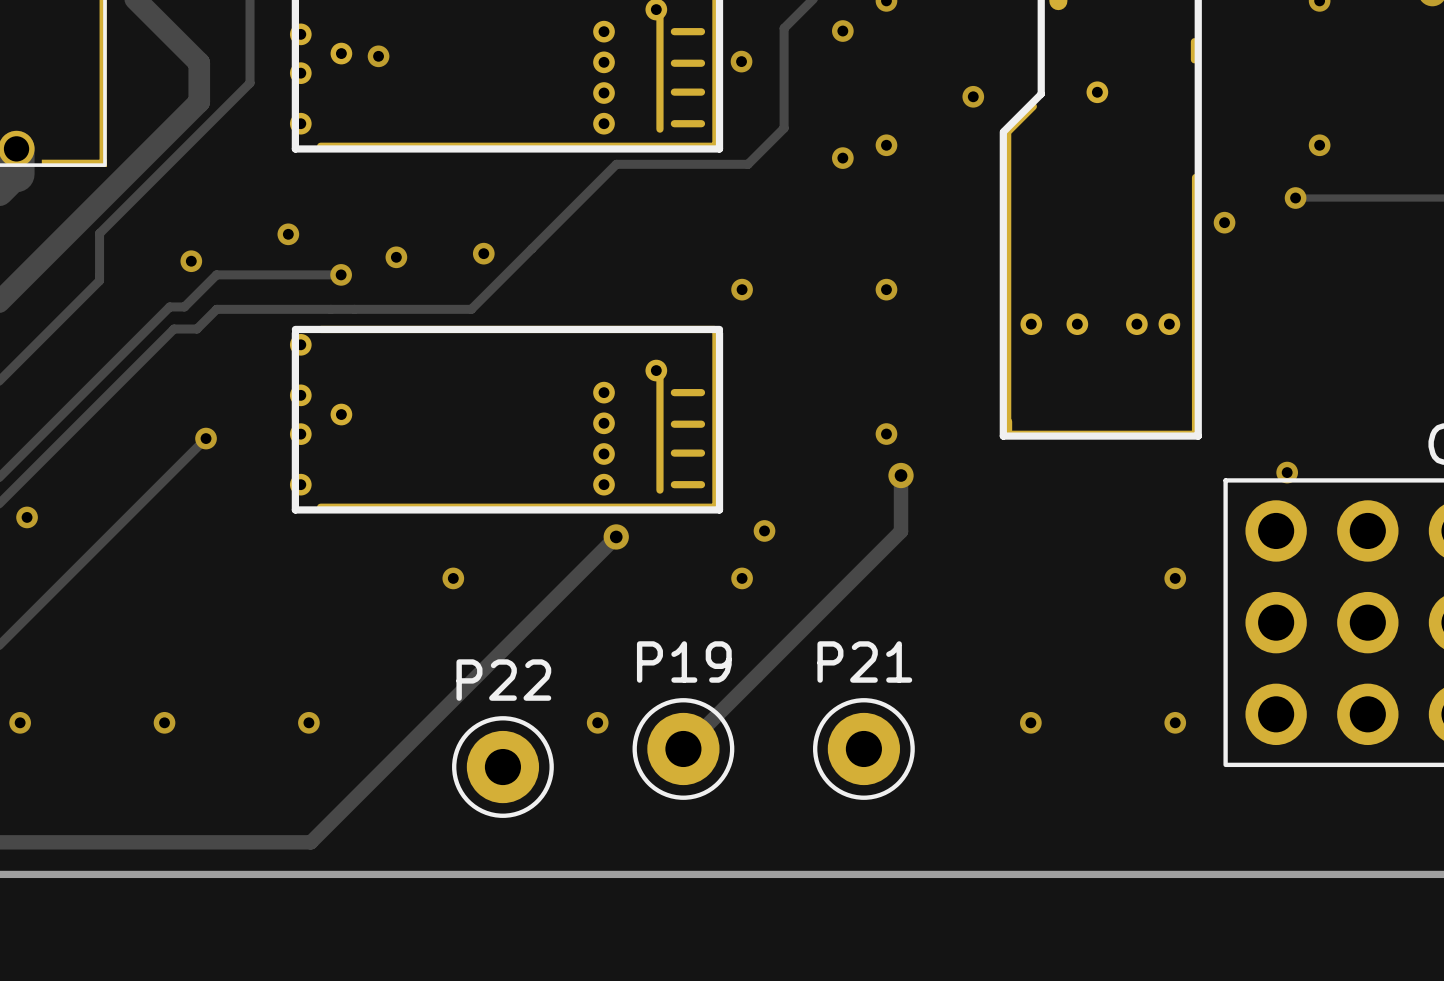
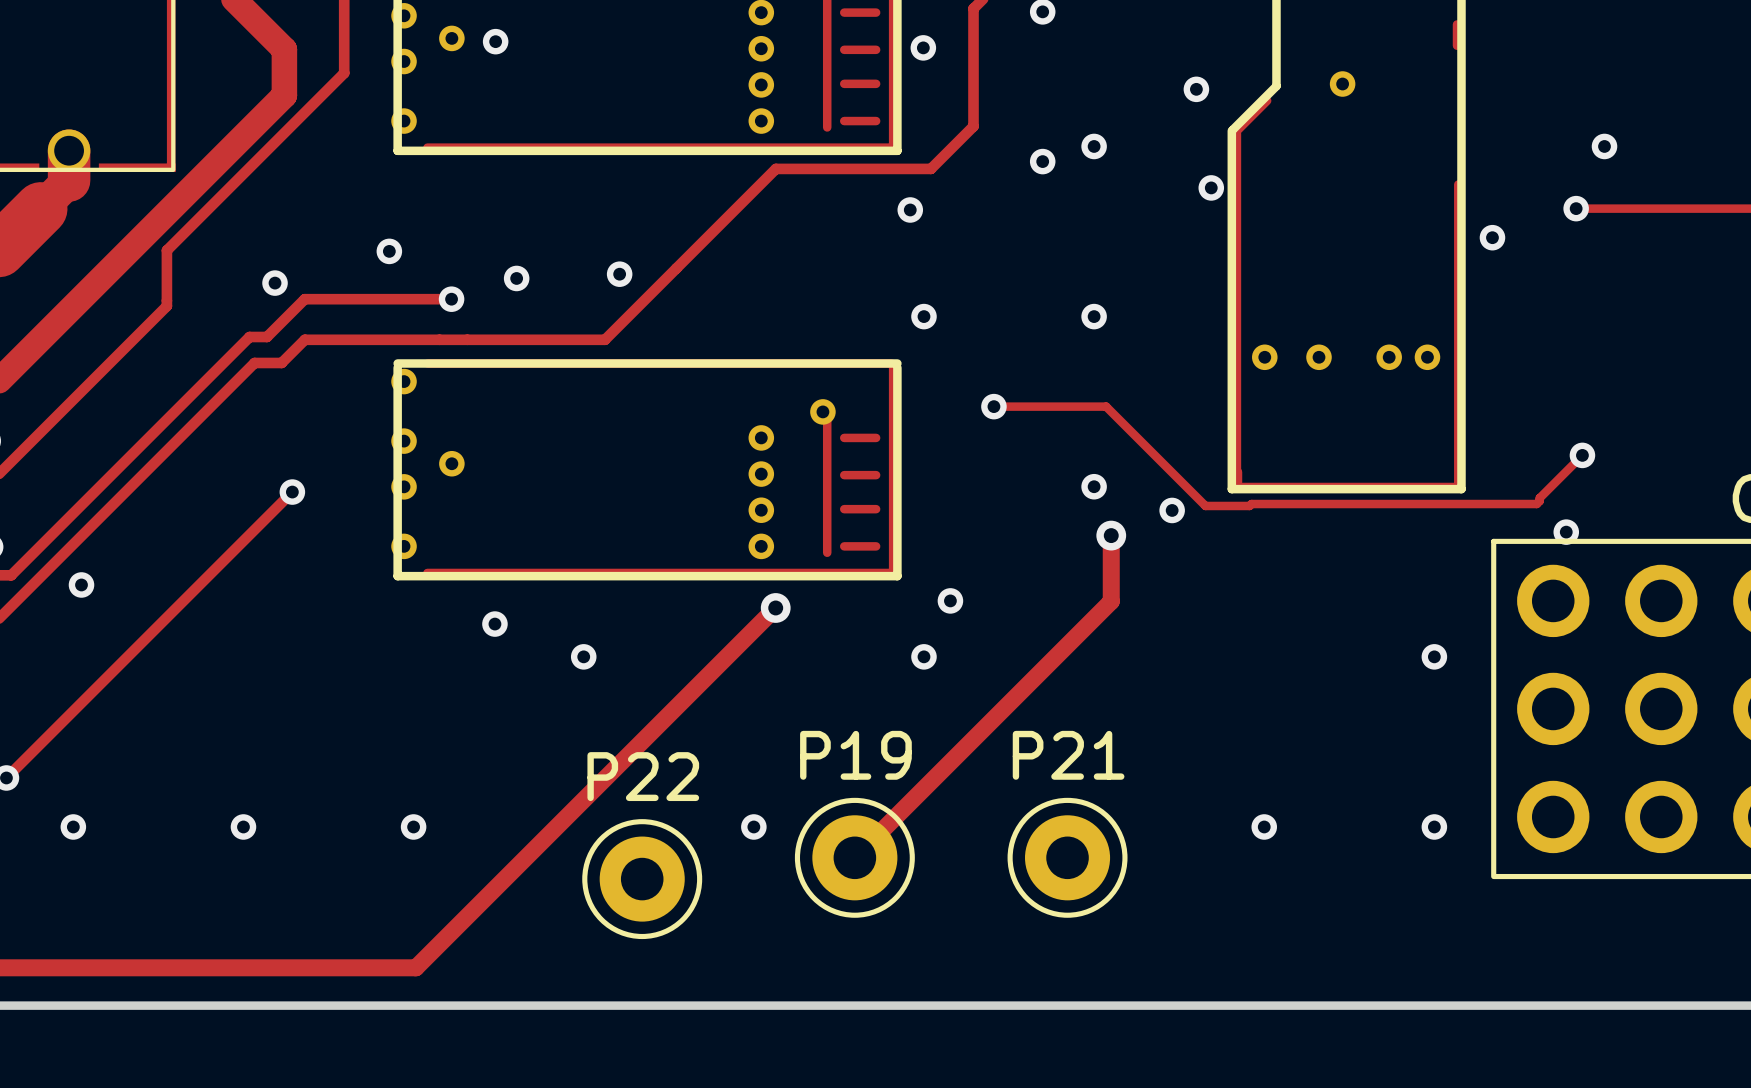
via: none -> (1211, 187)
via: none -> (910, 209)
track: none -> (993, 406) (1106, 406) (1205, 505) (1249, 505) (1251, 504) (1536, 504) (1539, 498) (1582, 455)
via: none -> (993, 406)
via: none -> (1582, 455)
via: none -> (1172, 510)
via: none -> (494, 624)

